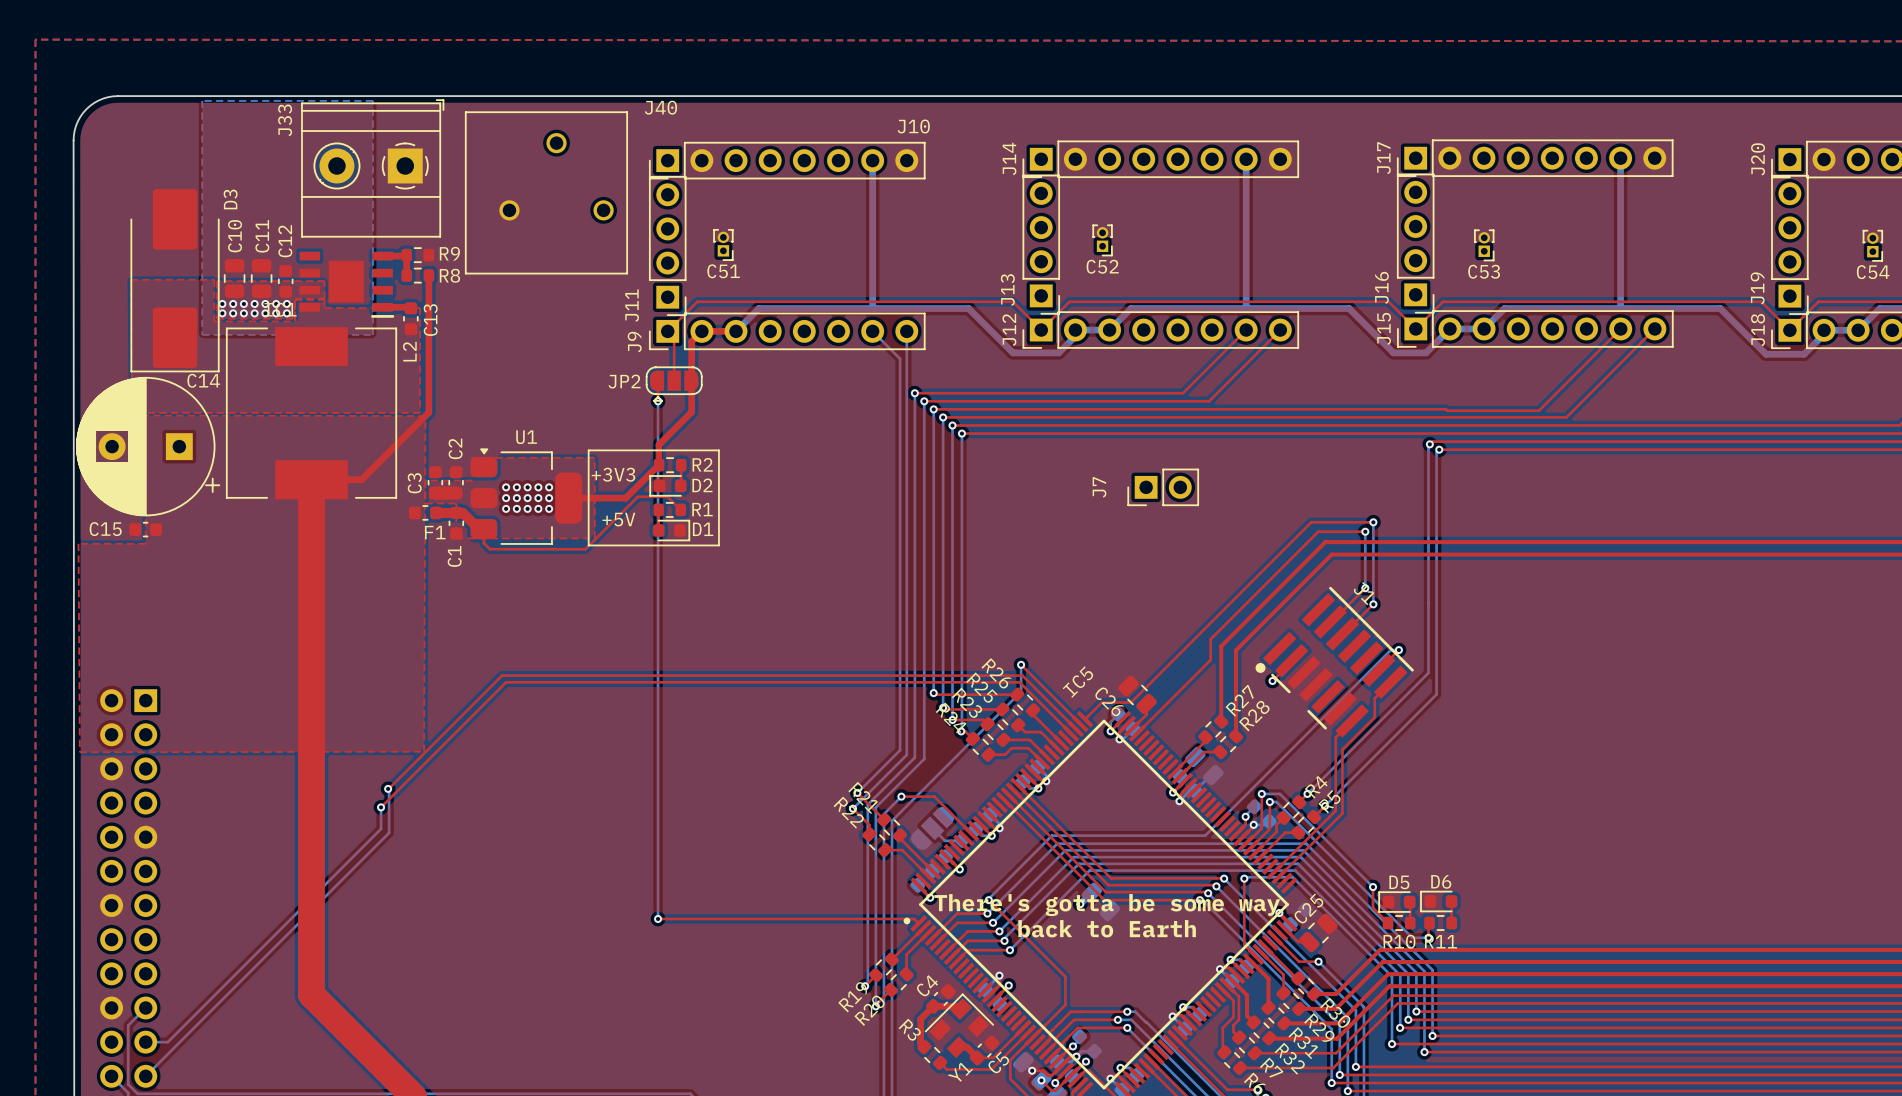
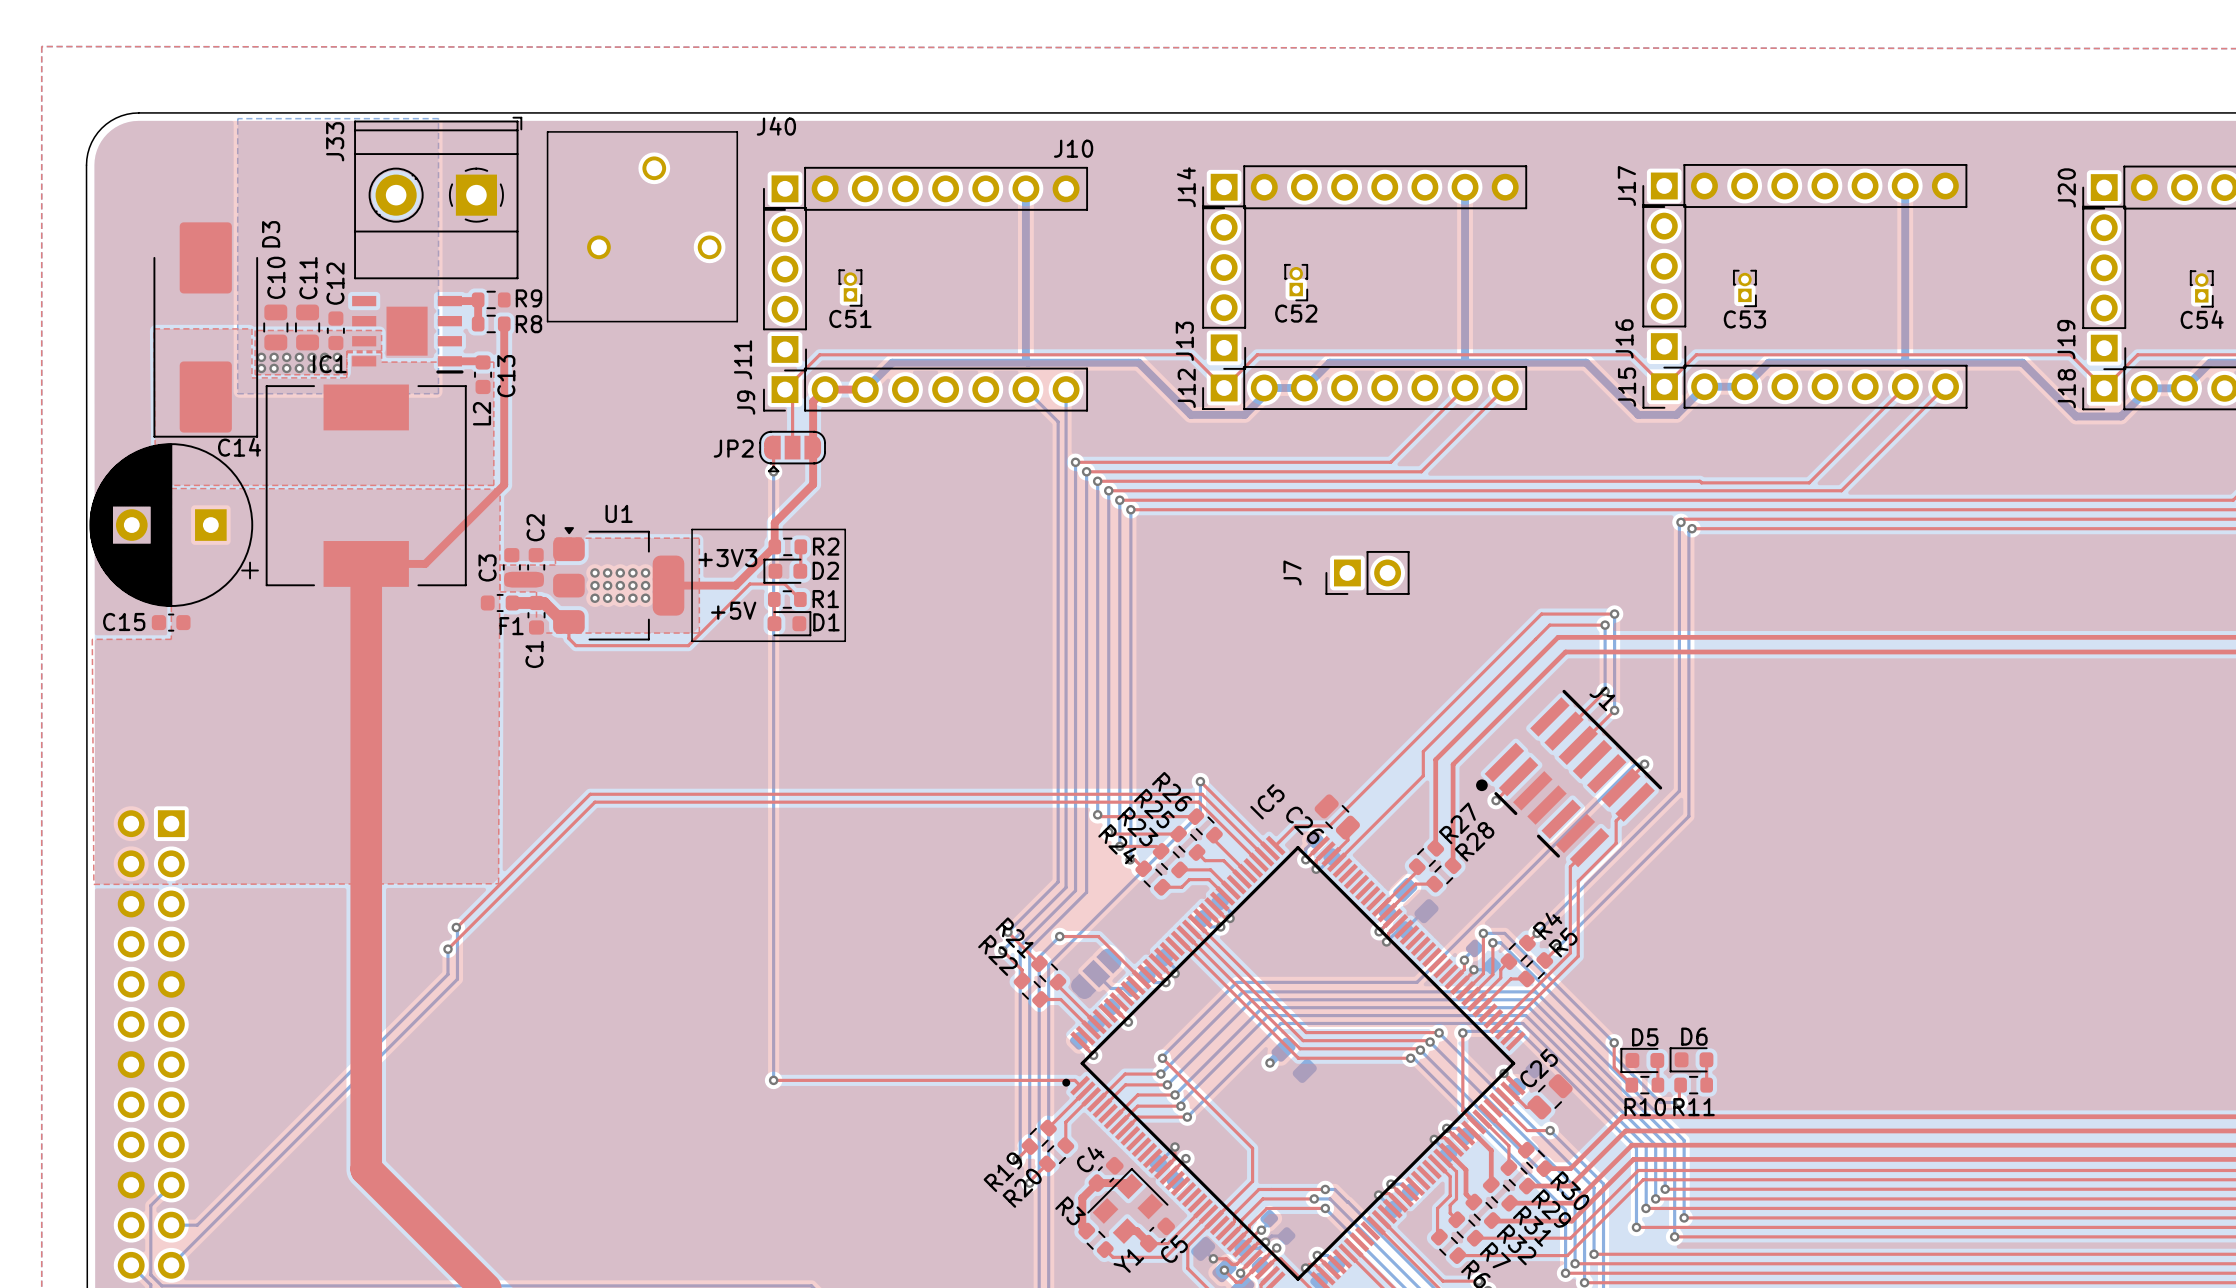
text: There's gotta be some way (1107, 905) -> none
text: back to Earth (1107, 928) -> none

